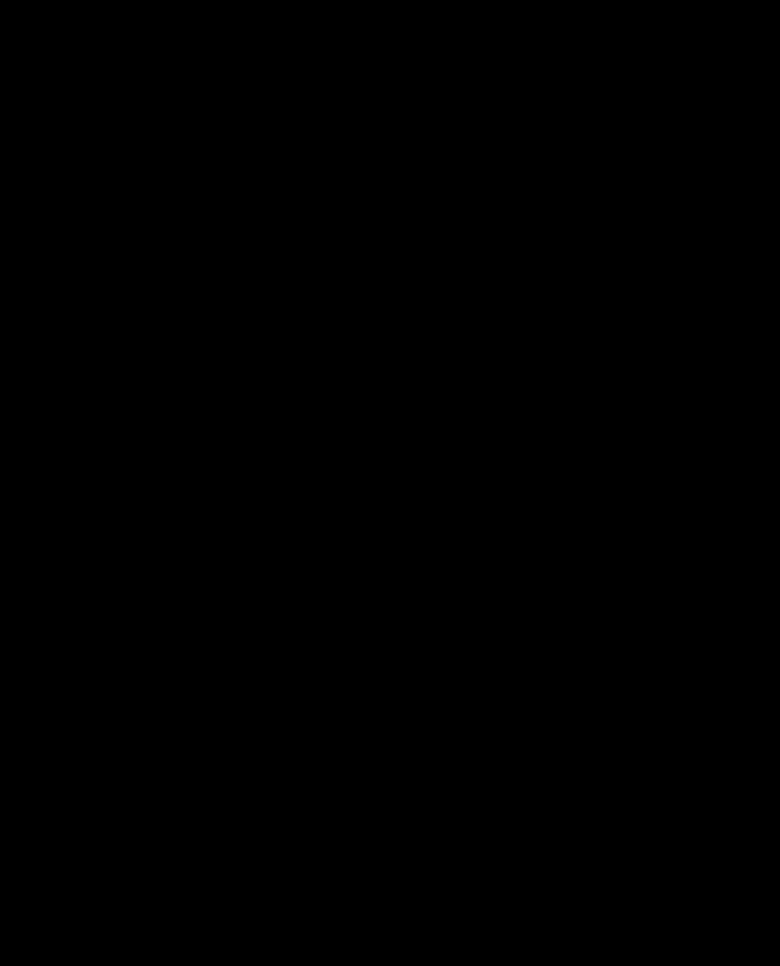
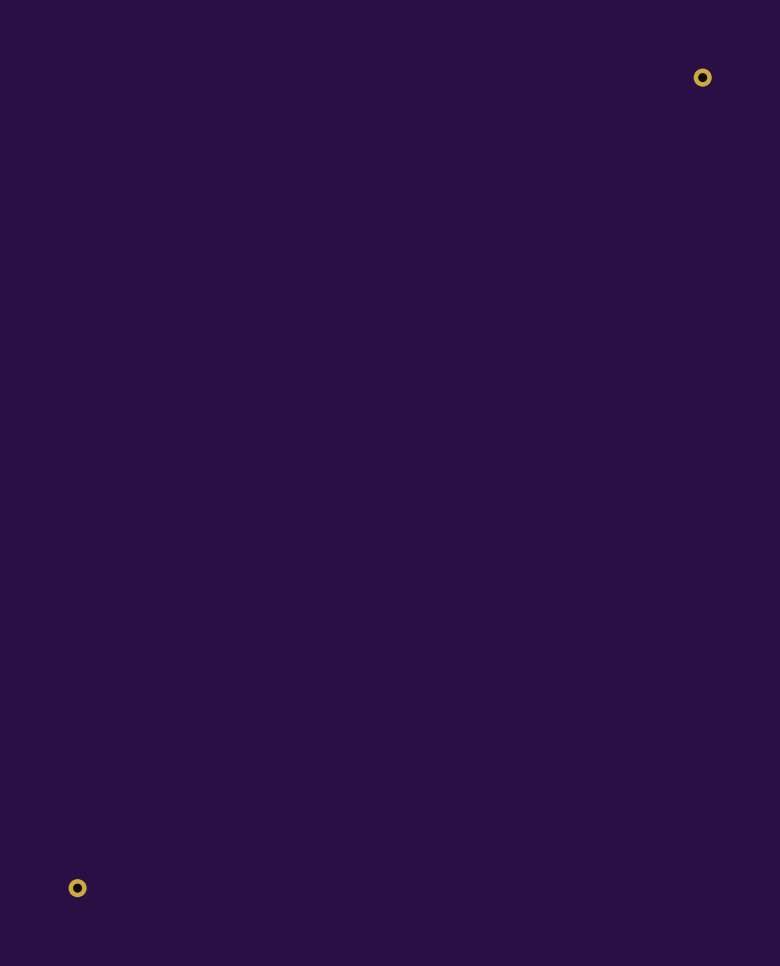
via: none -> (702, 77)
via: none -> (77, 888)

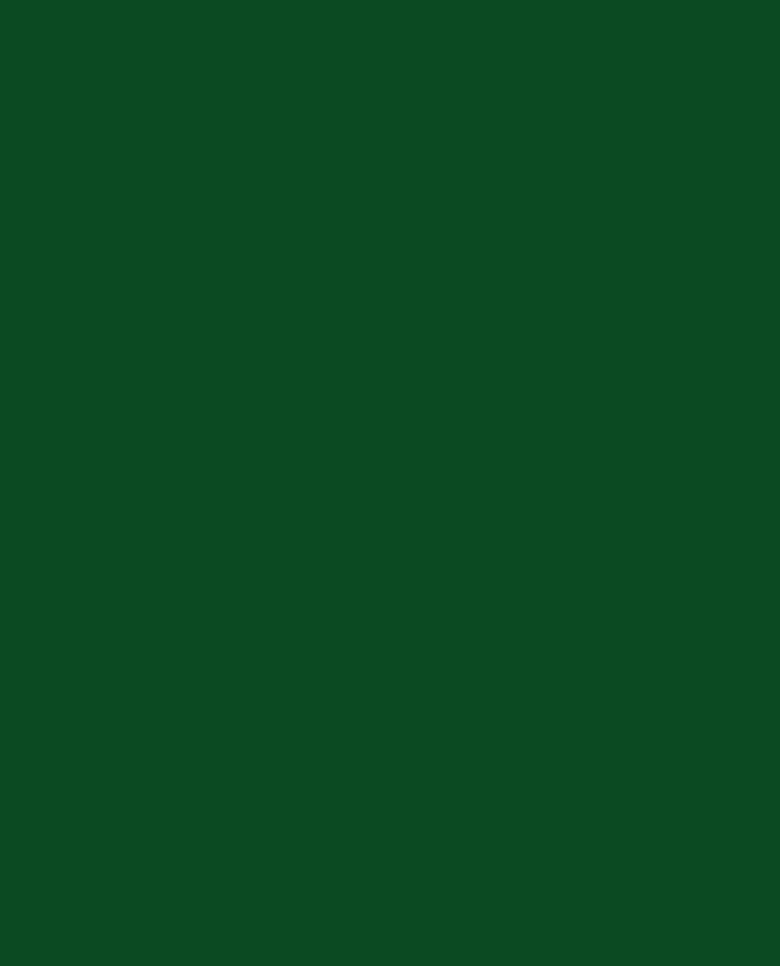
via: (702, 77) -> none
via: (77, 888) -> none

